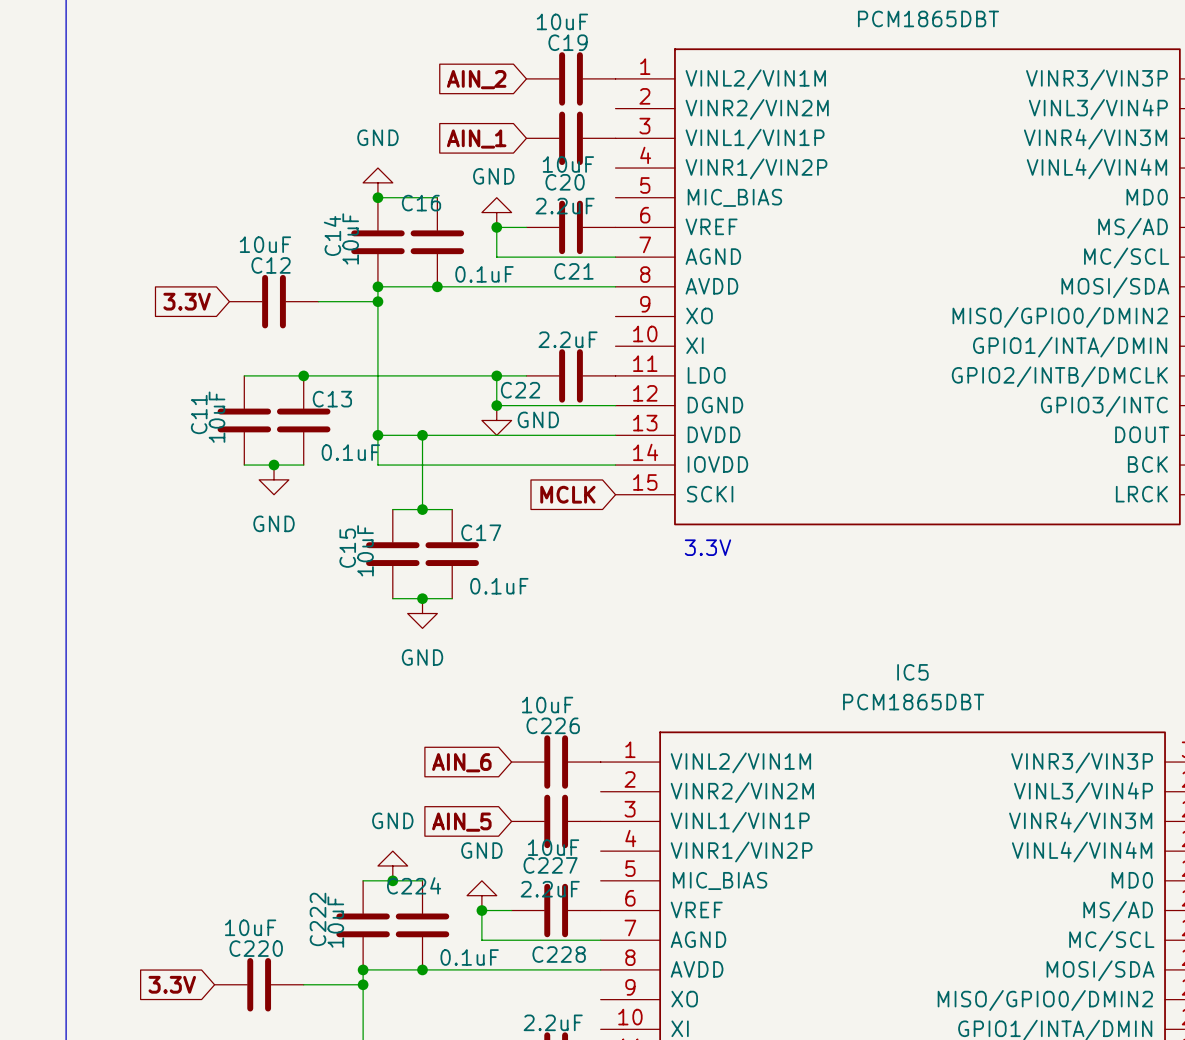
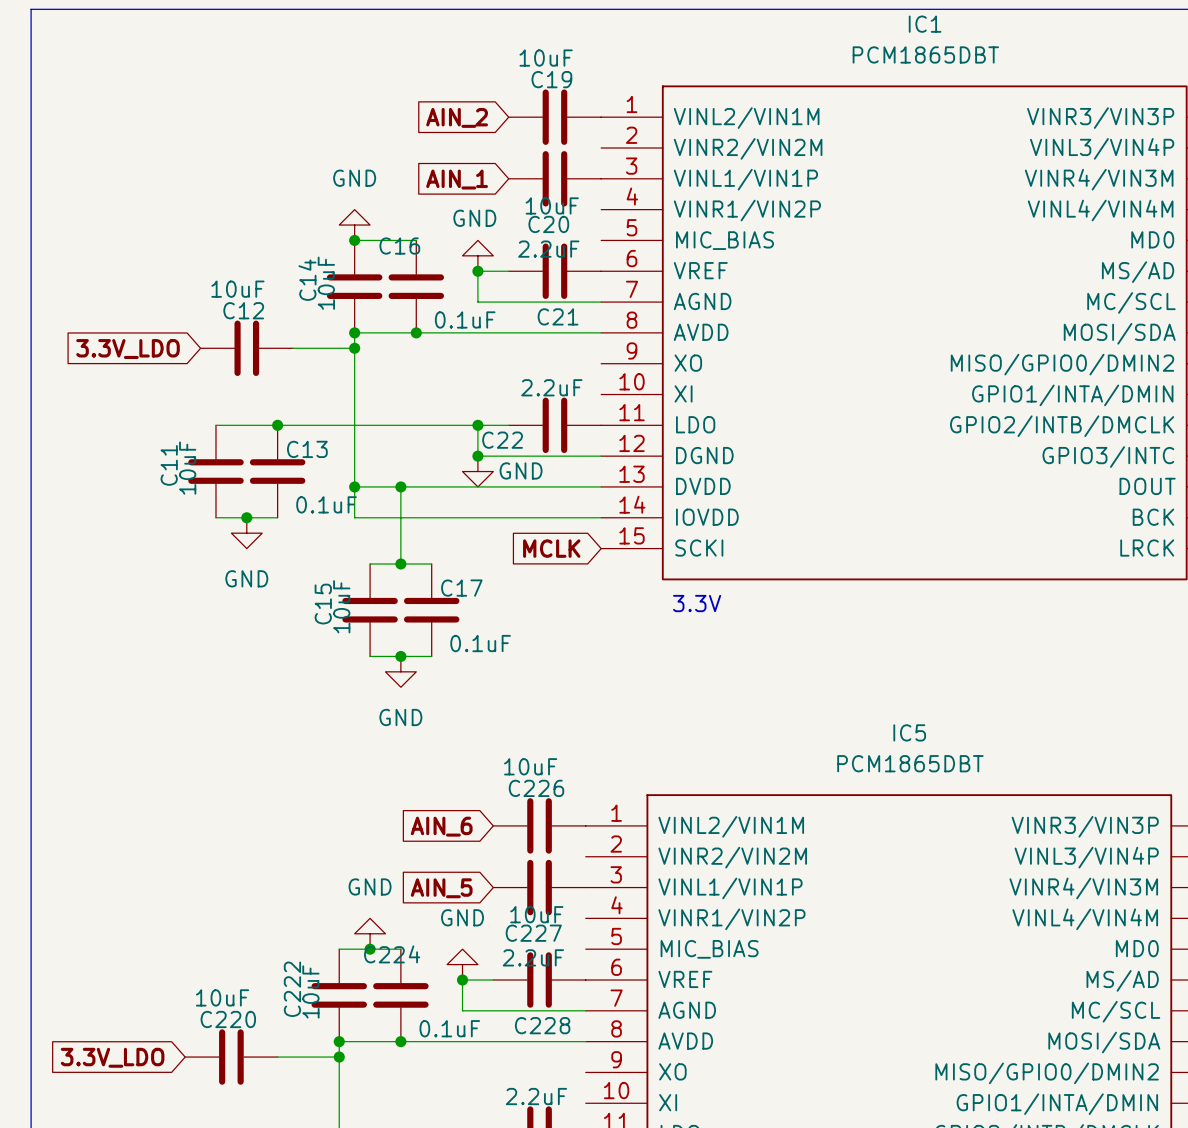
global label: 3.3V (187, 301) -> 3.3V_LDO (128, 349)
global label: 3.3V (172, 984) -> 3.3V_LDO (112, 1057)

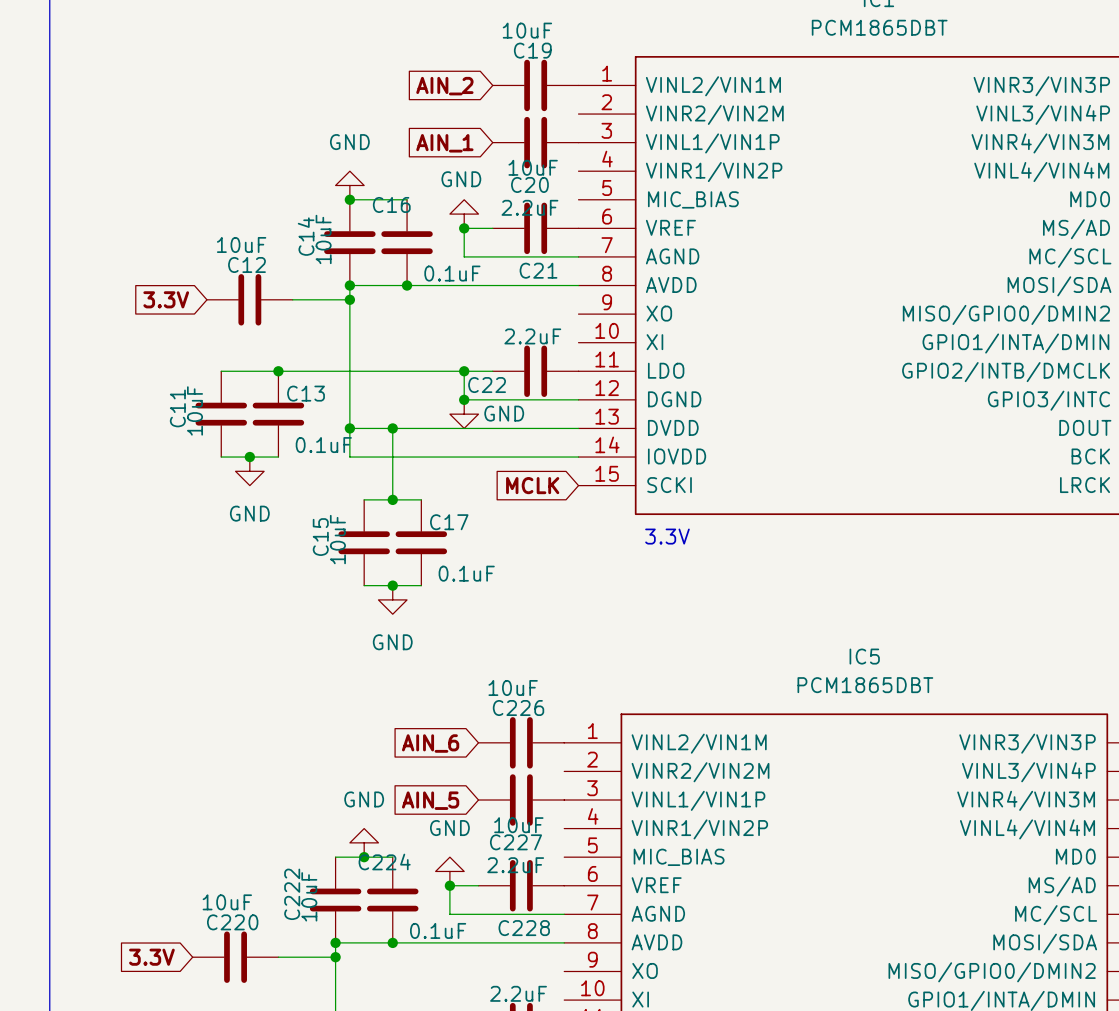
global label: 3.3V_LDO (128, 349) -> 3.3V (166, 299)
global label: 3.3V_LDO (112, 1057) -> 3.3V (151, 957)

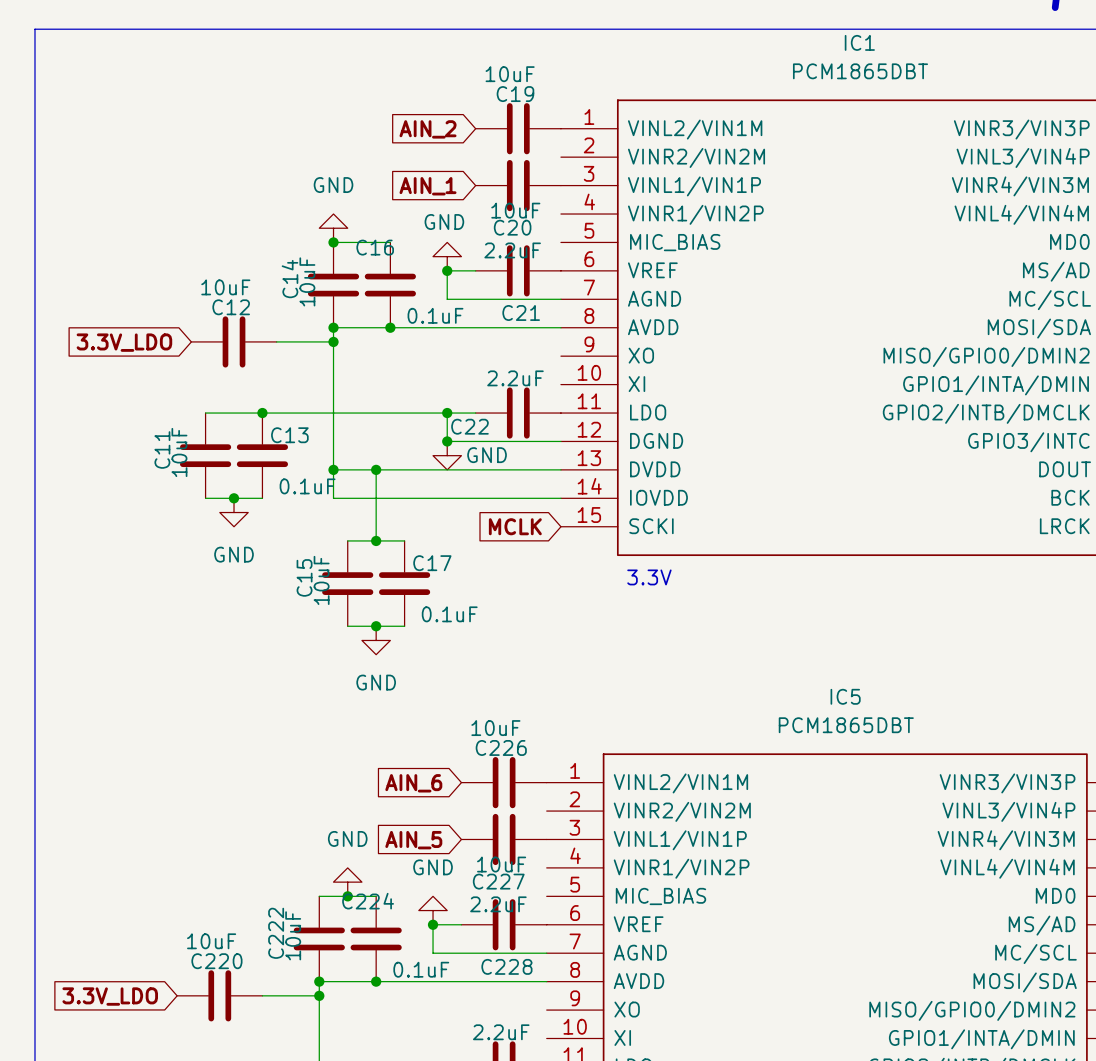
global label: 3.3V (166, 299) -> 3.3V_LDO (124, 342)
global label: 3.3V (151, 957) -> 3.3V_LDO (110, 996)

